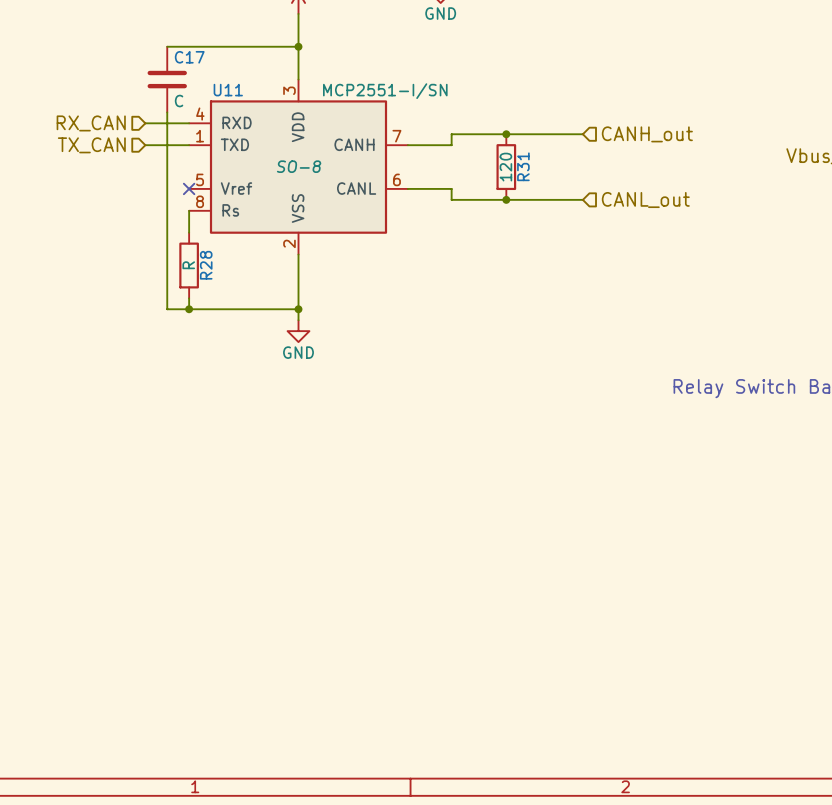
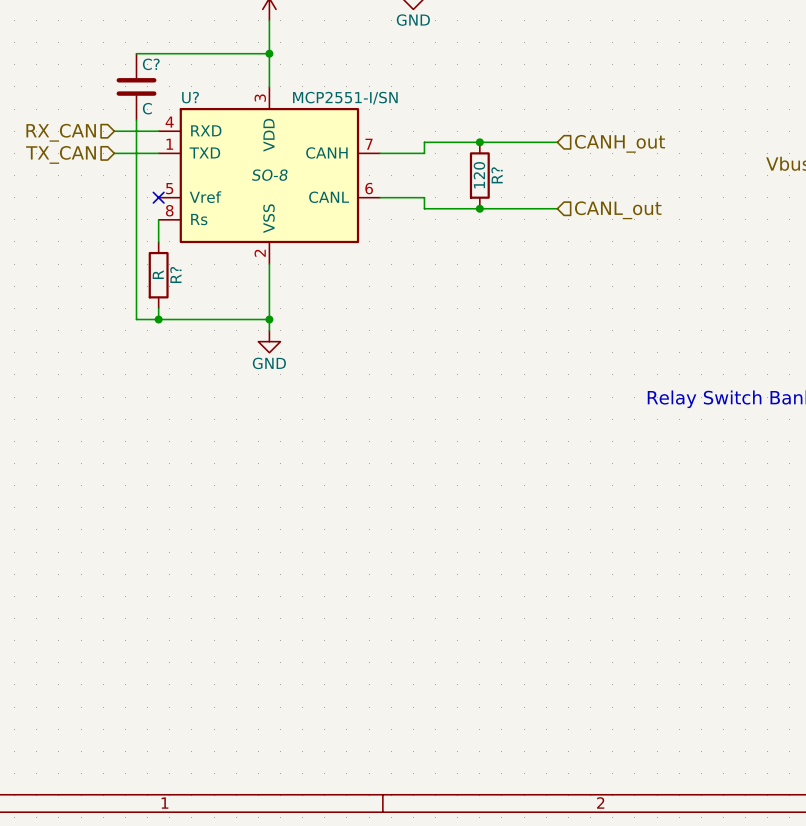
C17 name: C17 (189, 57) -> C? (151, 64)
U11 name: U11 (228, 90) -> U? (190, 97)
R31 name: R31 (523, 166) -> R? (497, 175)
R28 name: R28 (206, 265) -> R? (175, 274)

